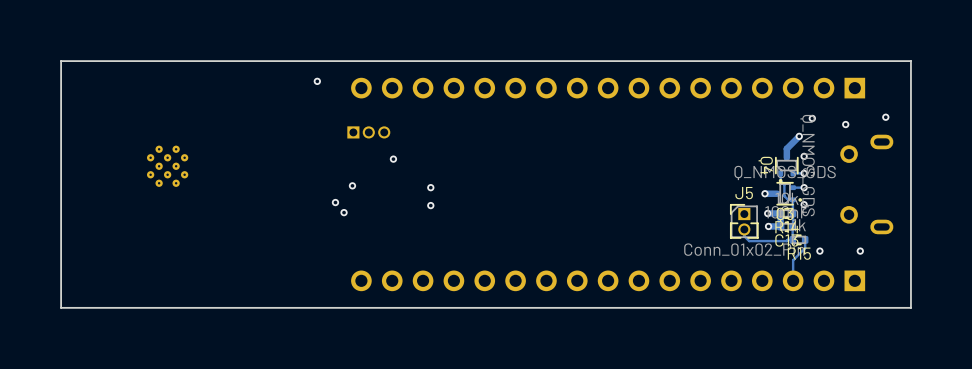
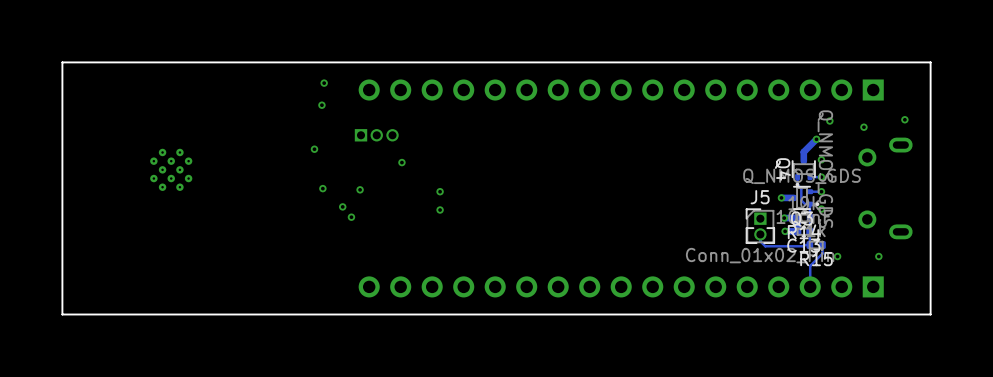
via: none -> (321, 105)
via: none -> (314, 149)
via: none -> (322, 188)

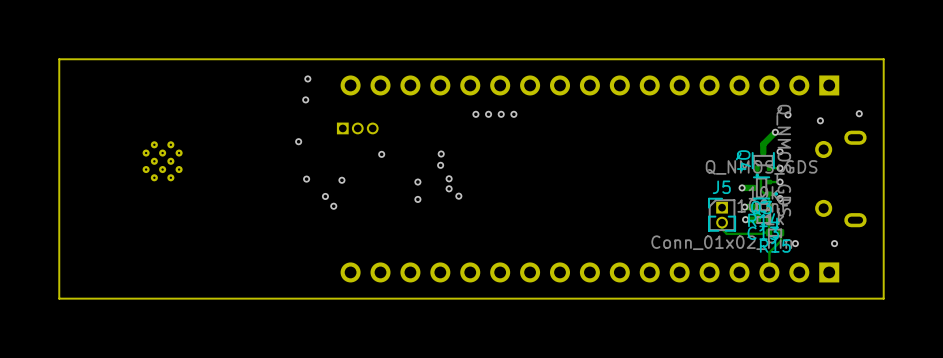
via: none -> (475, 114)
via: none -> (488, 114)
via: none -> (501, 114)
via: none -> (513, 114)
via: none -> (441, 154)
via: none -> (440, 165)
via: none -> (449, 178)
via: none -> (449, 188)
via: none -> (458, 196)

